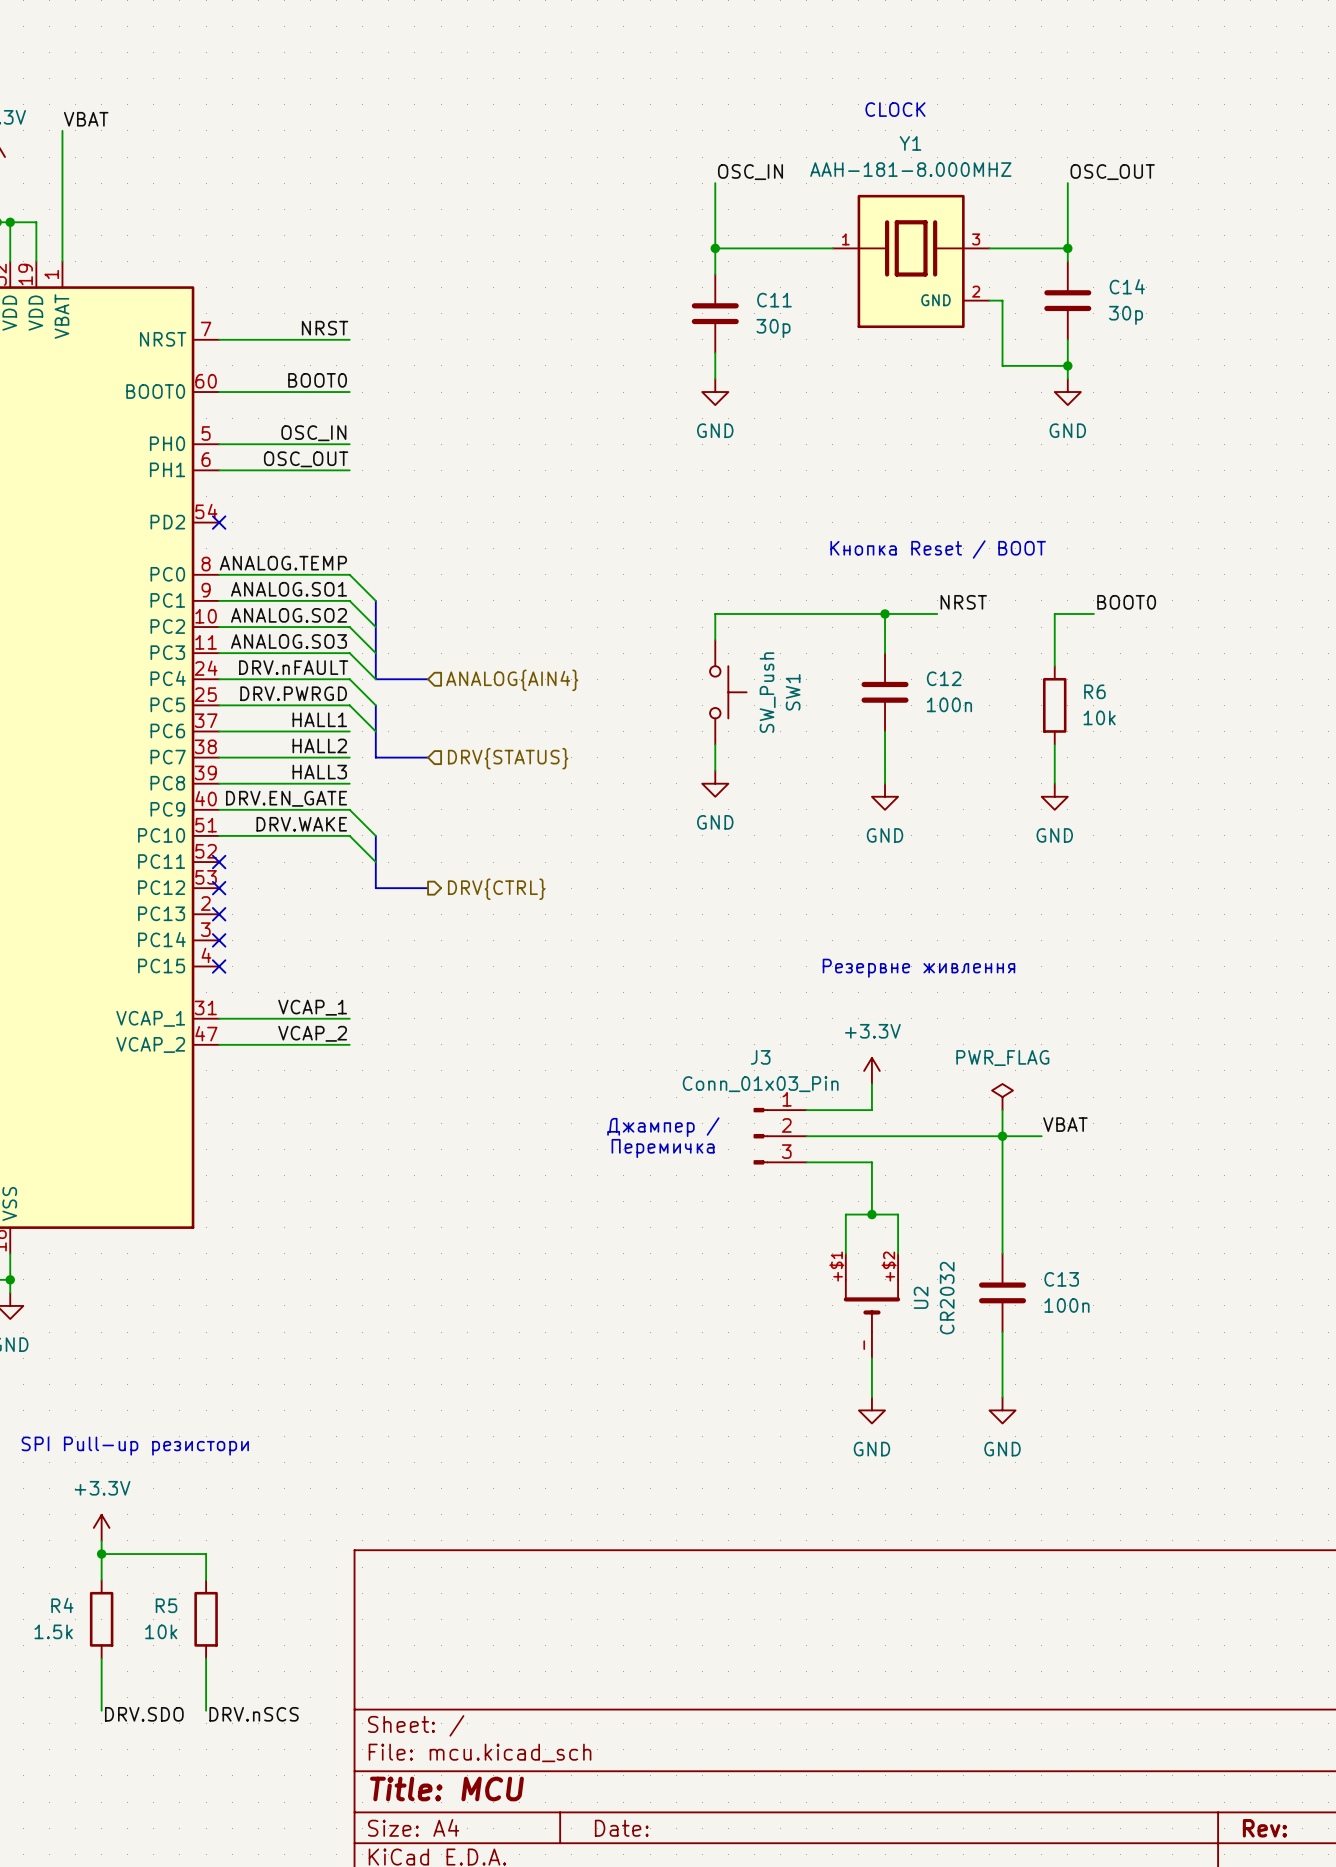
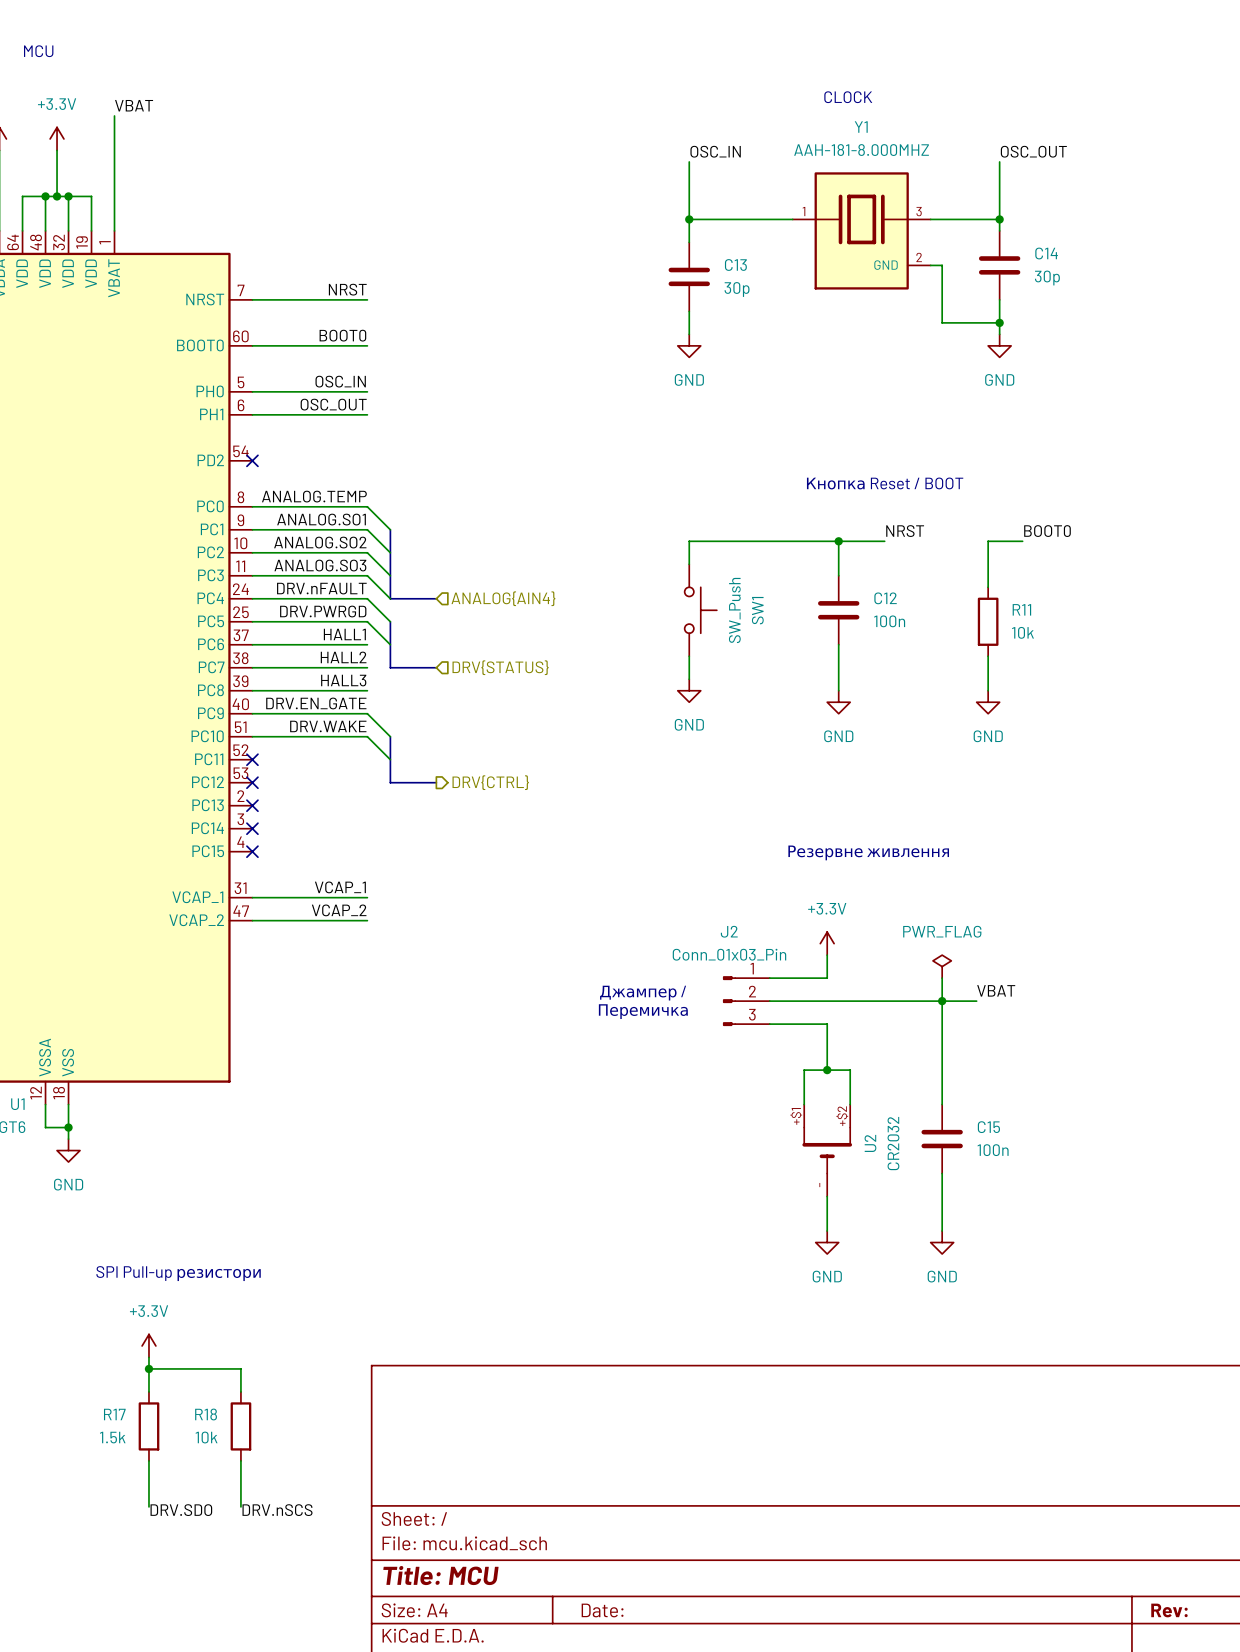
C11 name: C11 (774, 300) -> C13 (735, 265)
R6 name: R6 (1094, 691) -> R11 (1021, 609)
J3 name: J3 (760, 1057) -> J2 (729, 931)
C13 name: C13 (1061, 1279) -> C15 (988, 1127)
R4 name: R4 (62, 1605) -> R17 (114, 1414)
R5 name: R5 (166, 1605) -> R18 (206, 1414)

